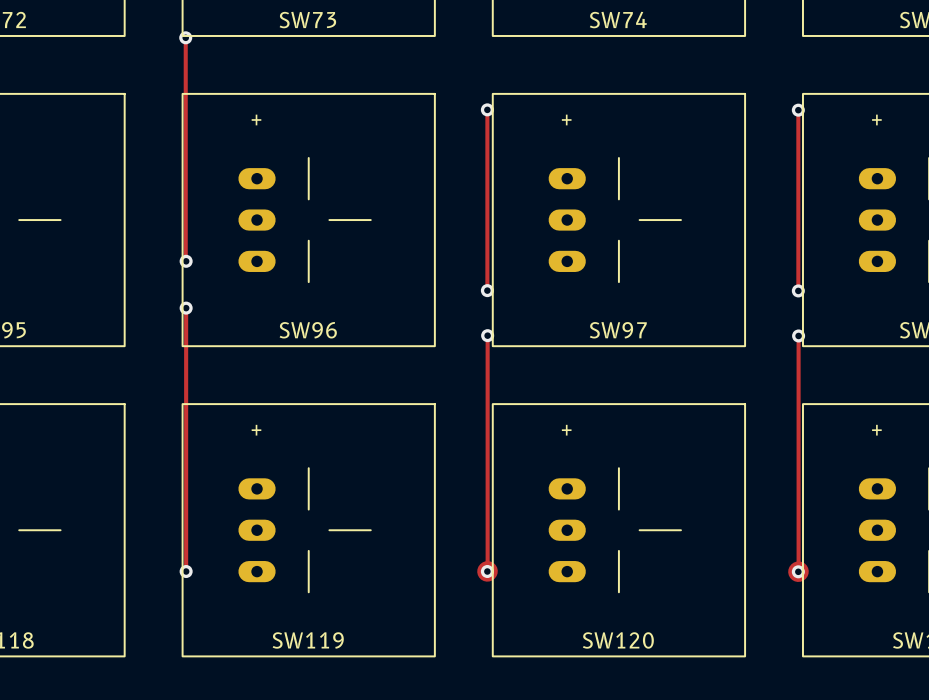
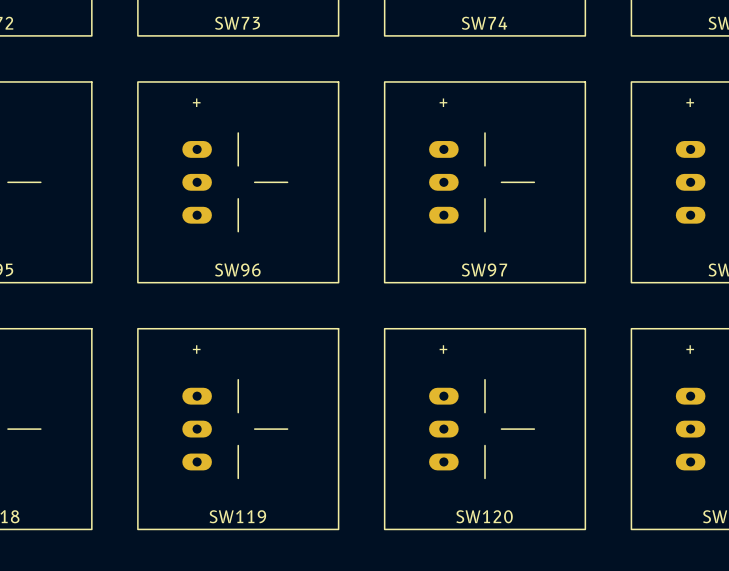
track: (185, 37) (186, 261) -> none
via: (185, 37) -> none
track: (487, 109) (487, 290) -> none
via: (487, 109) -> none
track: (798, 110) (798, 290) -> none
via: (798, 110) -> none
via: (186, 261) -> none
via: (487, 290) -> none
via: (798, 290) -> none
track: (186, 308) (186, 571) -> none
via: (186, 308) -> none
track: (487, 335) (487, 571) -> none
via: (487, 335) -> none
track: (798, 335) (798, 571) -> none
via: (798, 335) -> none
via: (186, 571) -> none
via: (487, 571) -> none
via: (798, 571) -> none

